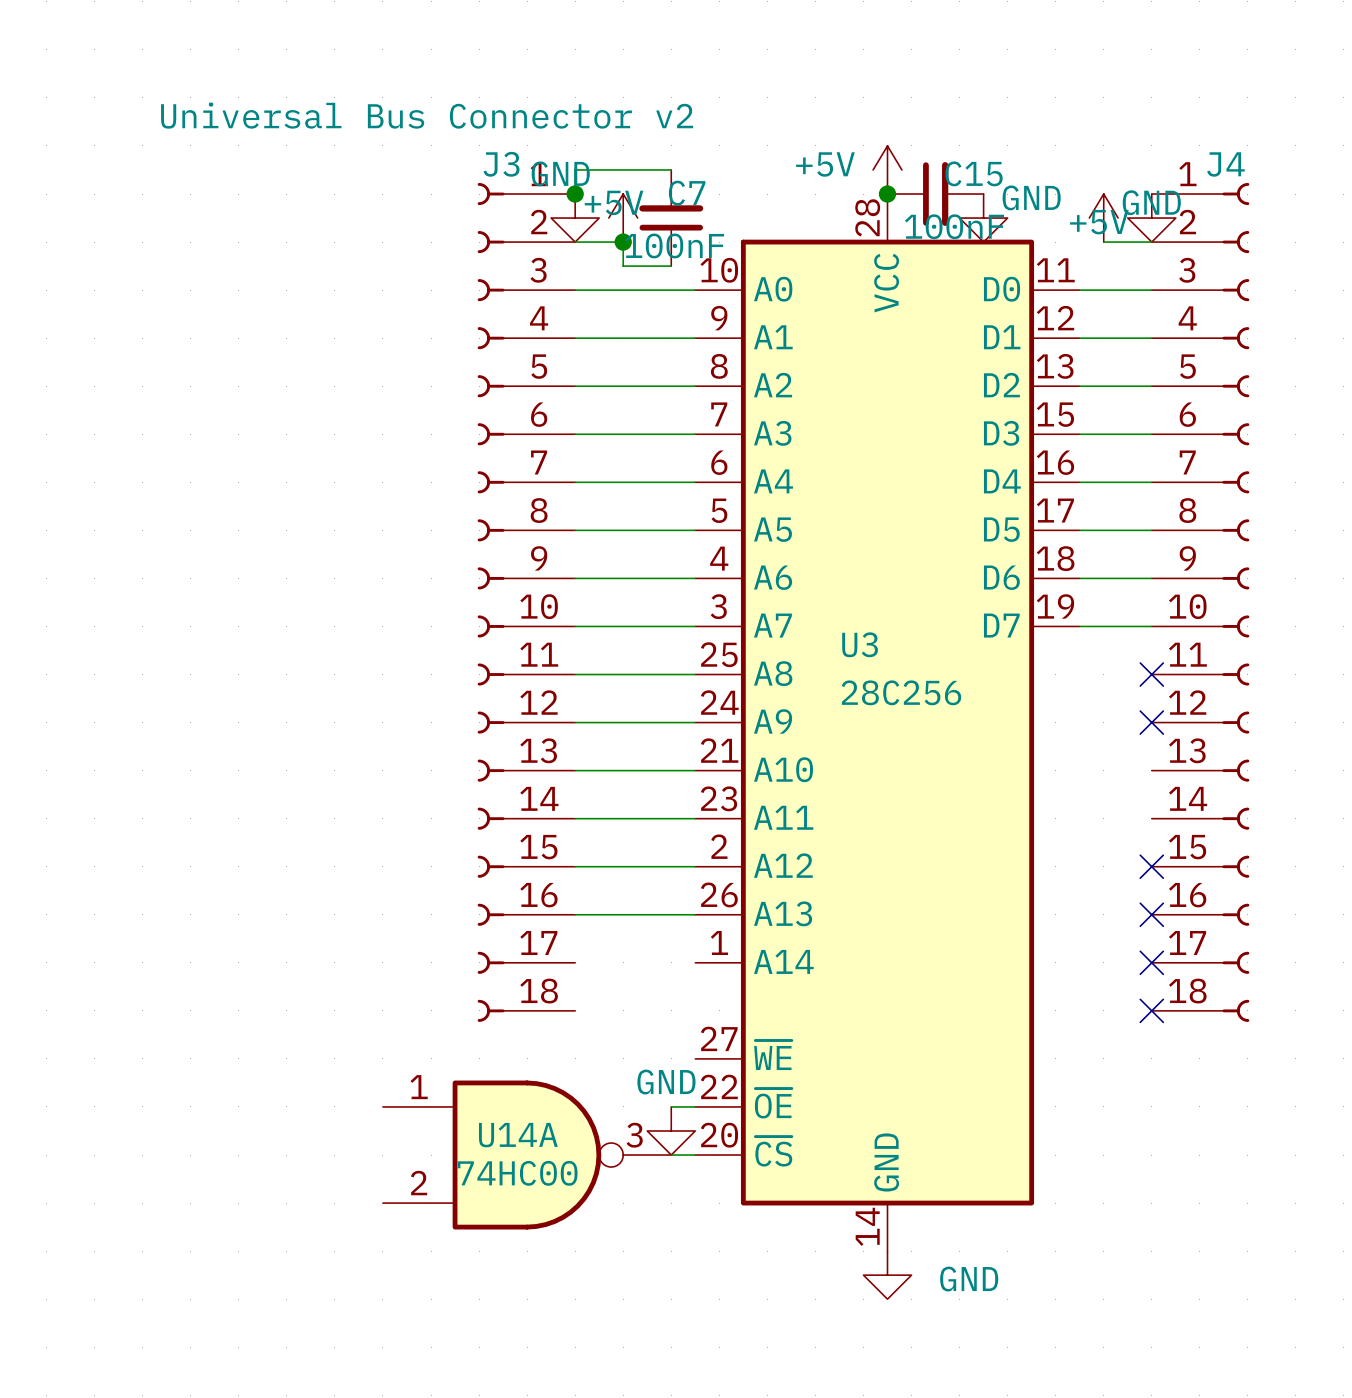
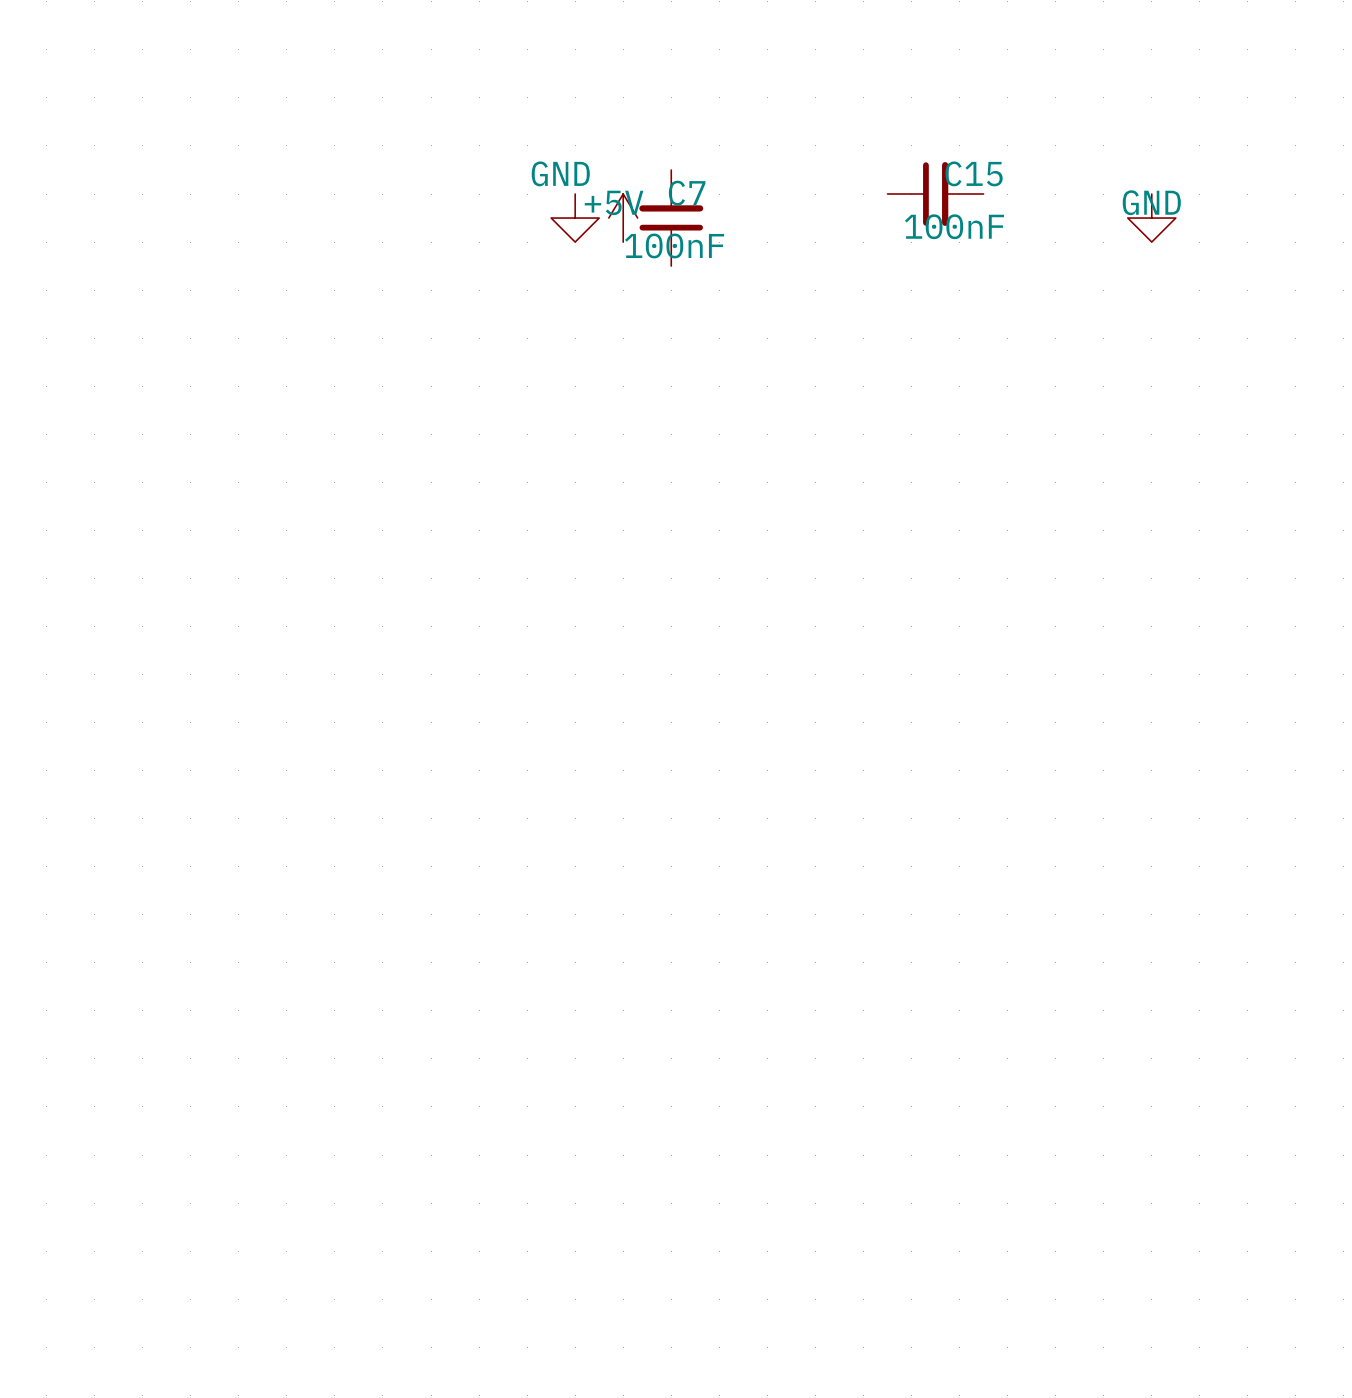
wire: (671, 169) (575, 169) (575, 194) -> none
power symbol: +5V (887, 169) -> none
junction: (575, 194) -> none
junction: (887, 194) -> none
power symbol: GND (983, 218) -> none
power symbol: +5V (1103, 218) -> none
wire: (575, 242) (623, 242) (623, 266) (671, 266) -> none
junction: (623, 242) -> none
wire: (1103, 242) (1151, 242) -> none
wire: (575, 290) (695, 290) -> none
wire: (1079, 290) (1151, 290) -> none
wire: (575, 338) (695, 338) -> none
wire: (1079, 338) (1151, 338) -> none
wire: (575, 386) (695, 386) -> none
wire: (1079, 386) (1151, 386) -> none
wire: (575, 434) (695, 434) -> none
wire: (1079, 434) (1151, 434) -> none
wire: (575, 482) (695, 482) -> none
wire: (1079, 482) (1151, 482) -> none
wire: (575, 530) (695, 530) -> none
wire: (1079, 530) (1151, 530) -> none
wire: (575, 578) (695, 578) -> none
wire: (1079, 578) (1151, 578) -> none
J3: Universal Bus Connector v2 (526, 602) -> none
J4: (1200, 602) -> none
wire: (575, 626) (695, 626) -> none
wire: (1079, 626) (1151, 626) -> none
wire: (575, 674) (695, 674) -> none
no-connect mark: (1151, 674) -> none
wire: (575, 722) (695, 722) -> none
U3: 28C256 (887, 722) -> none
no-connect mark: (1151, 722) -> none
wire: (575, 770) (695, 770) -> none
wire: (575, 818) (695, 818) -> none
wire: (575, 866) (695, 866) -> none
no-connect mark: (1151, 866) -> none
wire: (575, 914) (695, 914) -> none
no-connect mark: (1151, 914) -> none
no-connect mark: (1151, 962) -> none
no-connect mark: (1151, 1010) -> none
wire: (671, 1106) (695, 1106) -> none
power symbol: GND (671, 1130) -> none
U14A: 74HC00 (527, 1155) -> none
wire: (671, 1155) (695, 1155) -> none
power symbol: GND (887, 1275) -> none

